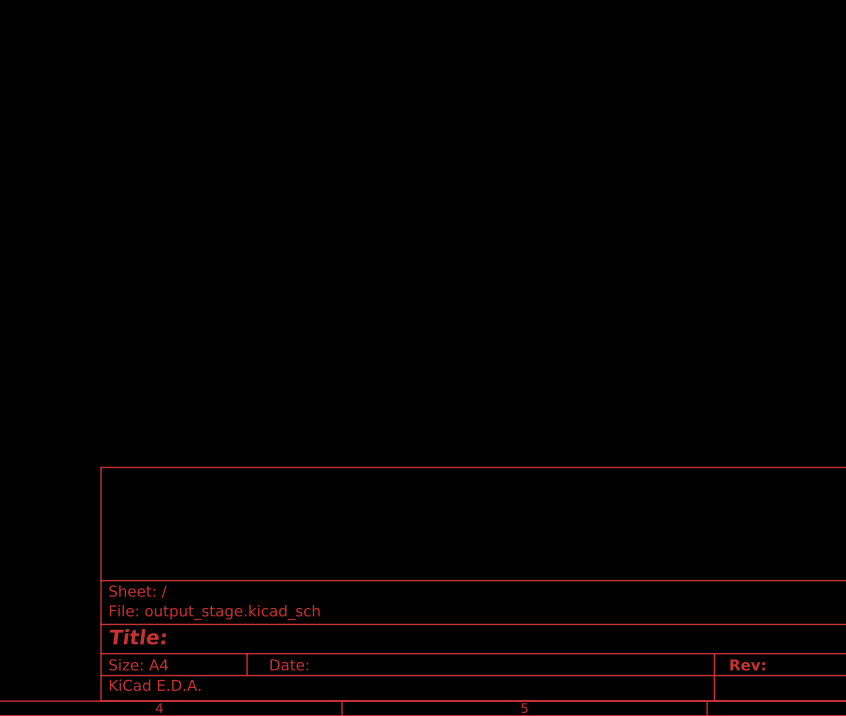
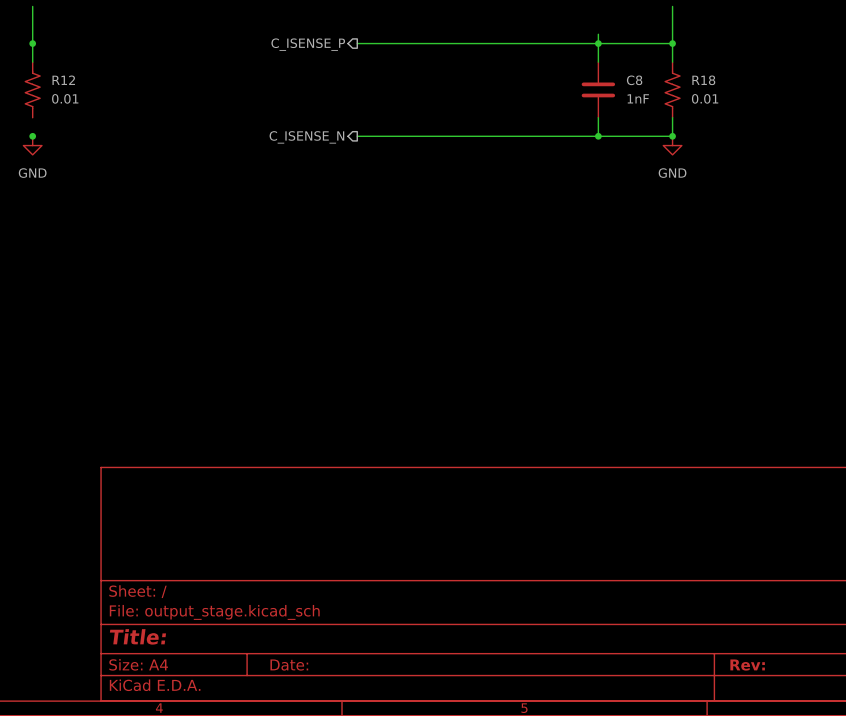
wire: none -> (32, 6) (32, 62)
wire: none -> (672, 6) (672, 62)
wire: none -> (598, 34) (598, 62)
junction: none -> (32, 43)
wire: none -> (357, 43) (672, 43)
junction: none -> (598, 43)
junction: none -> (672, 43)
hierarchical label: none -> C_ISENSE_P (308, 44)
R12: none -> 0.01 (32, 89)
C8: none -> 1nF (598, 89)
R18: none -> 0.01 (672, 89)
wire: none -> (598, 117) (598, 136)
wire: none -> (672, 117) (672, 136) (357, 136)
junction: none -> (32, 136)
junction: none -> (598, 136)
junction: none -> (672, 136)
hierarchical label: none -> C_ISENSE_N (306, 137)
power symbol: none -> GND (32, 145)
power symbol: none -> GND (672, 145)

